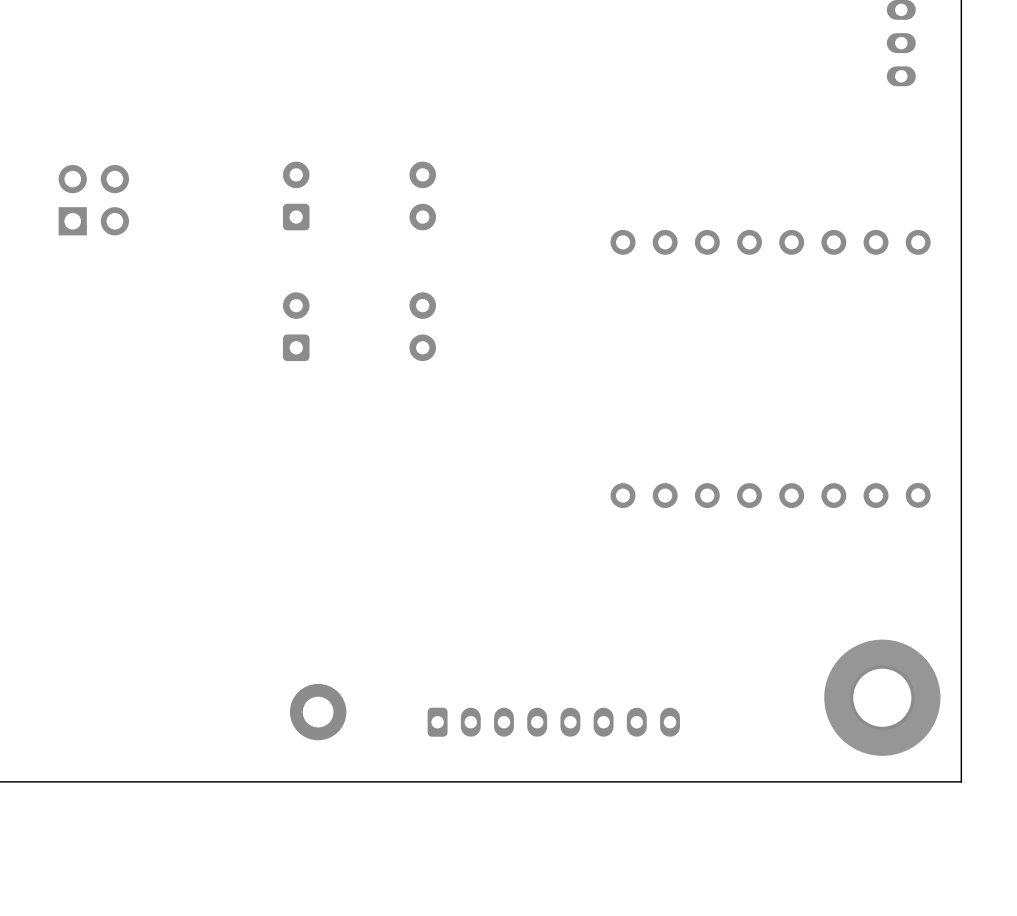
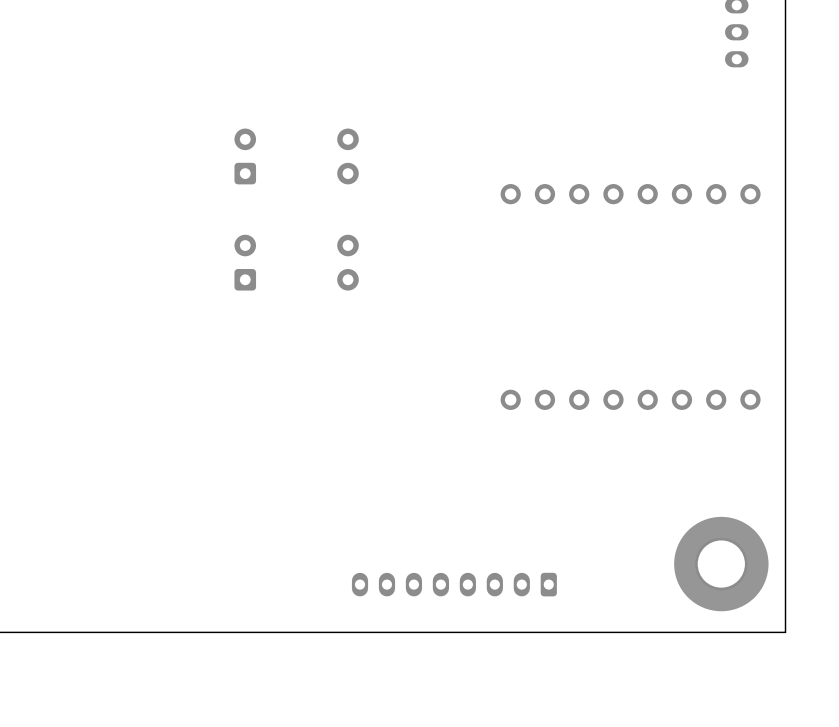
part: (93, 200) -> none
part: (318, 712) -> none
part rotation: 0° (553, 722) -> 180° (454, 584)

